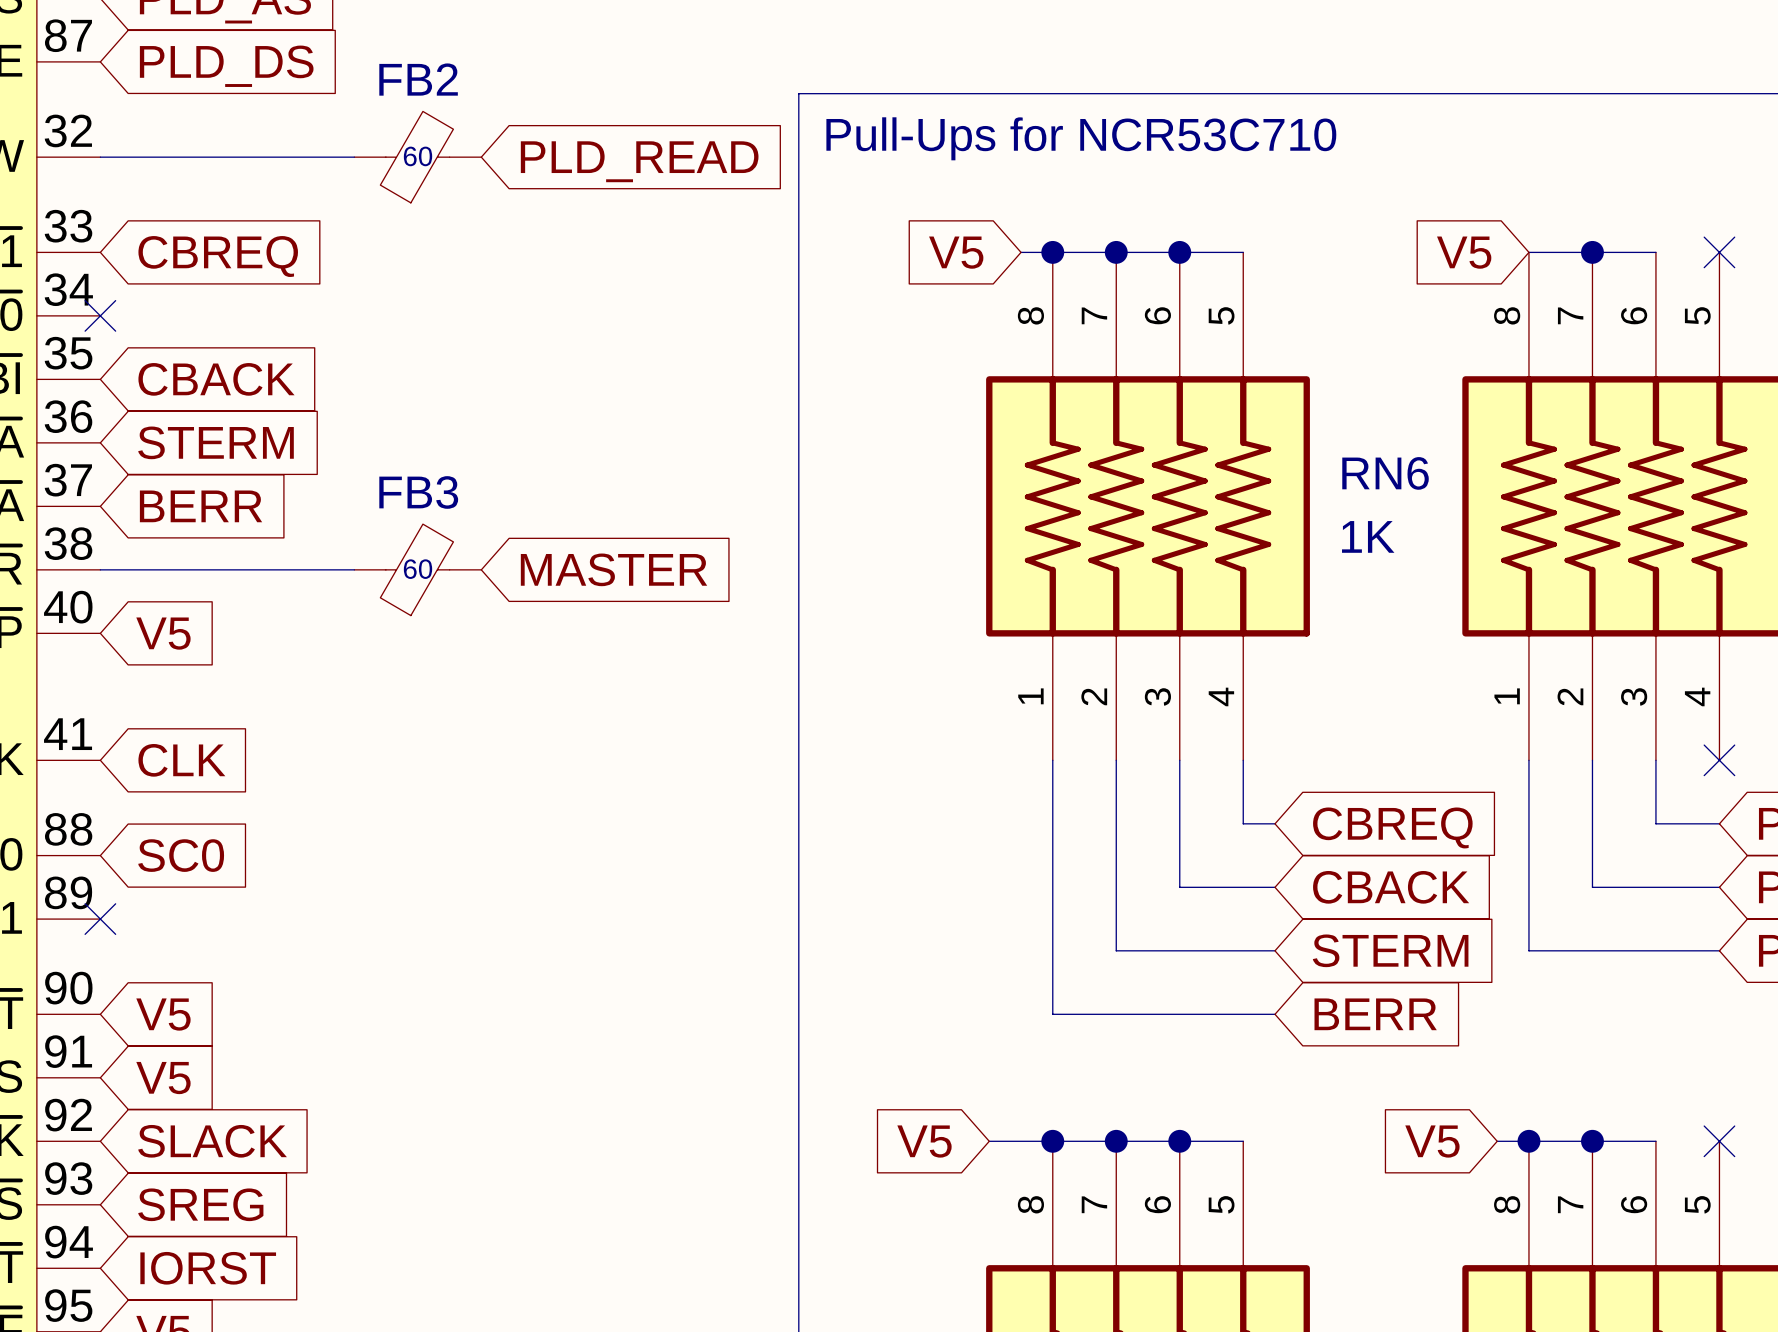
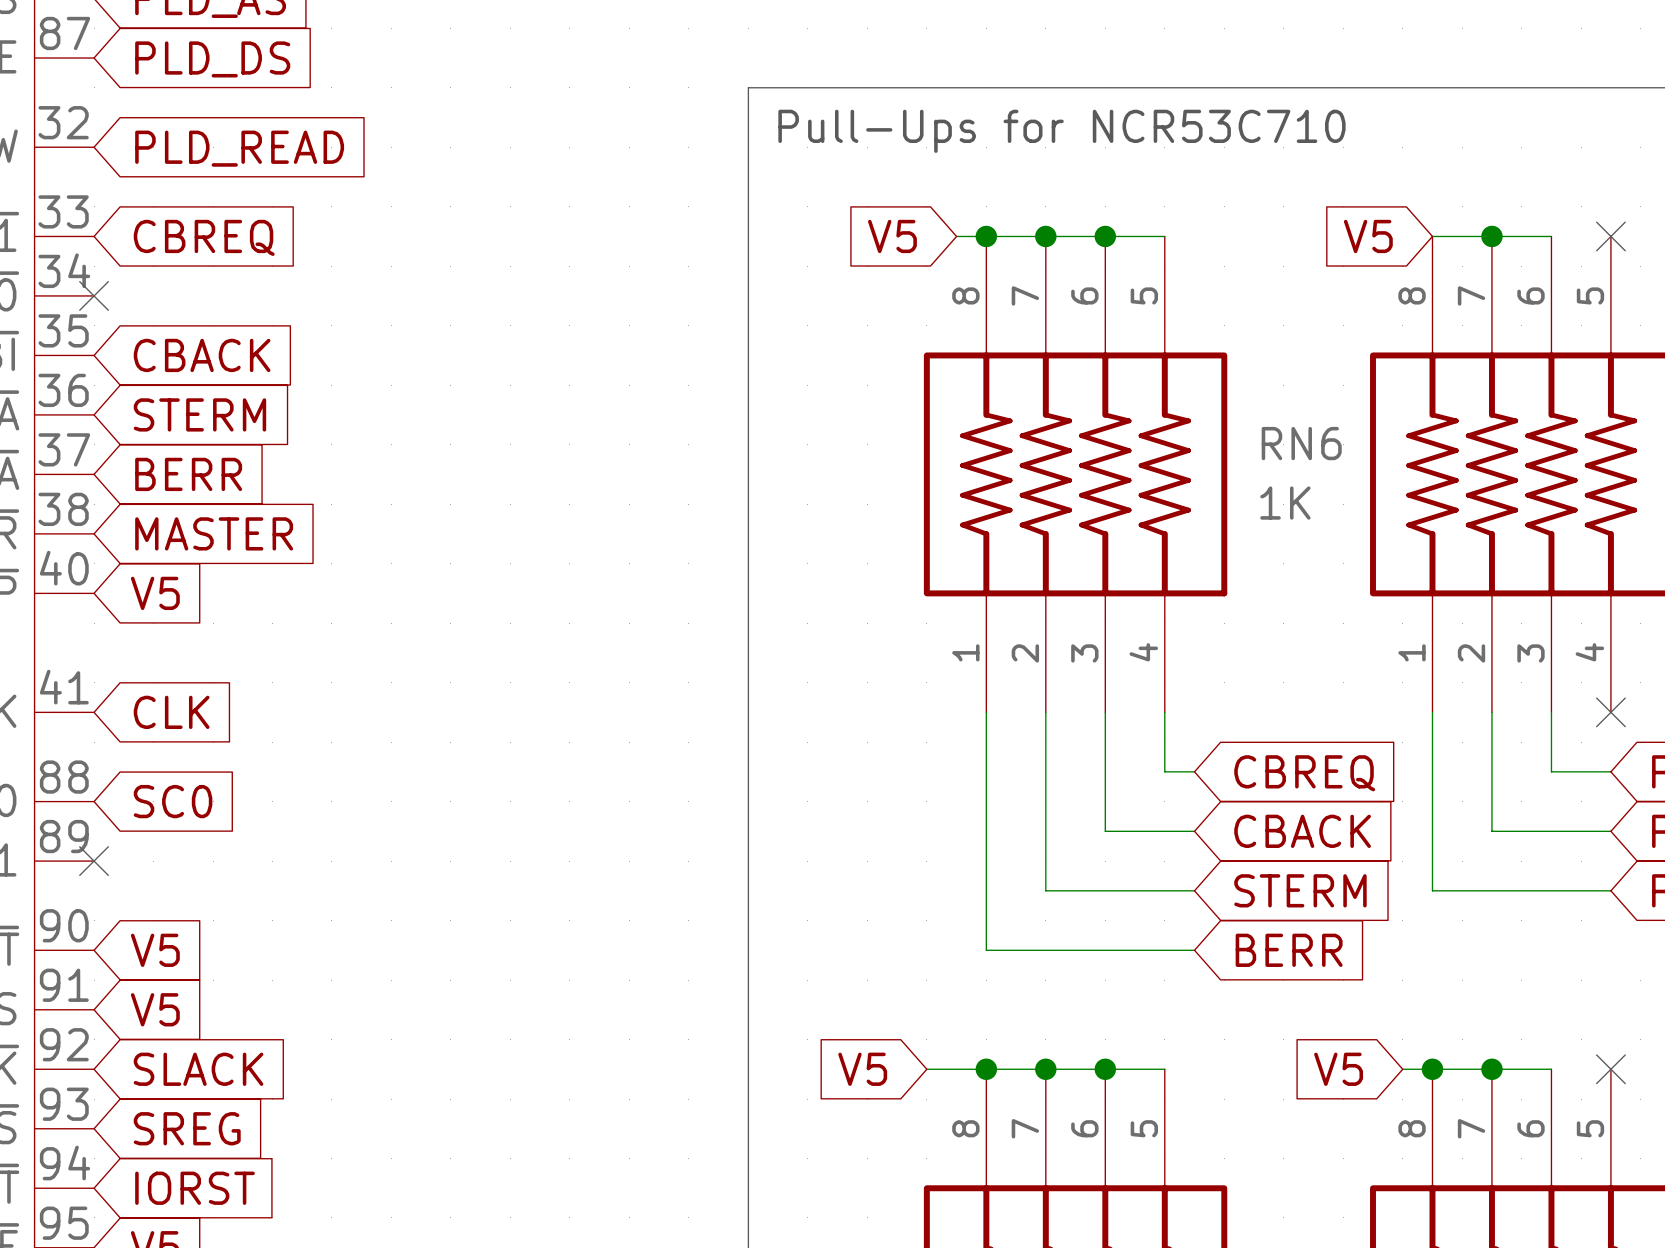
wire: (100, 157) (354, 157) -> none
FB2: 60 (417, 157) -> none
global label position: PLD_READ (639, 161) -> PLD_READ (239, 148)
wire: (100, 569) (354, 569) -> none
FB3: 60 (417, 569) -> none
global label position: MASTER (614, 569) -> MASTER (214, 533)

